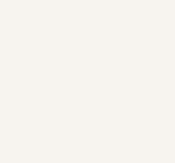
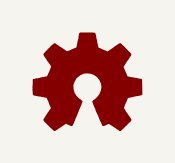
part: none -> (87, 81)

